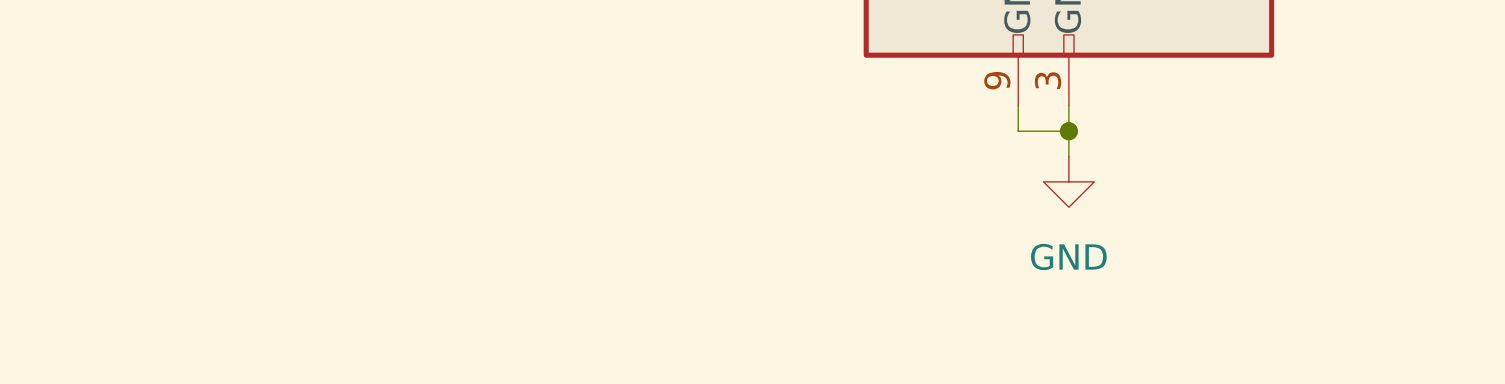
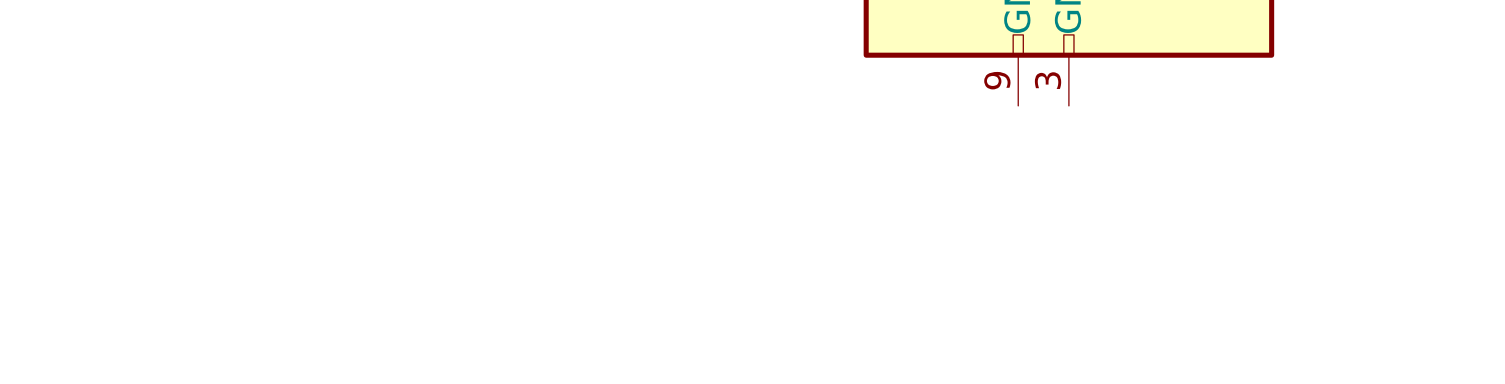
wire: (1018, 105) (1018, 131) (1068, 131) -> none
wire: (1068, 105) (1068, 156) -> none
junction: (1068, 131) -> none
power symbol: GND (1068, 181) -> none

